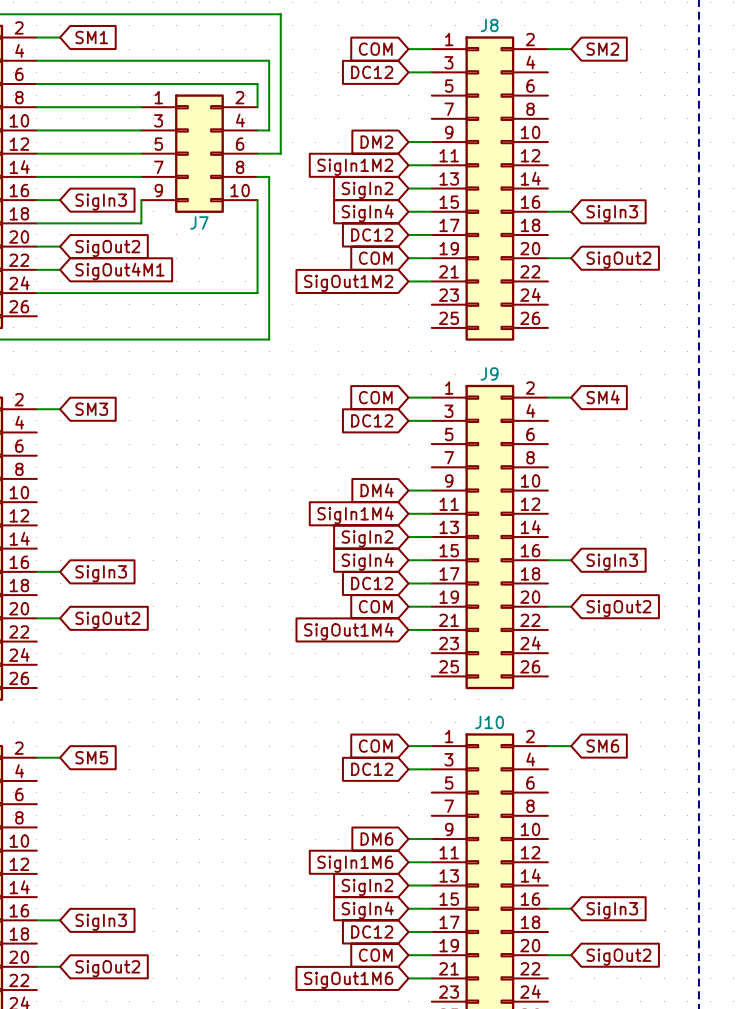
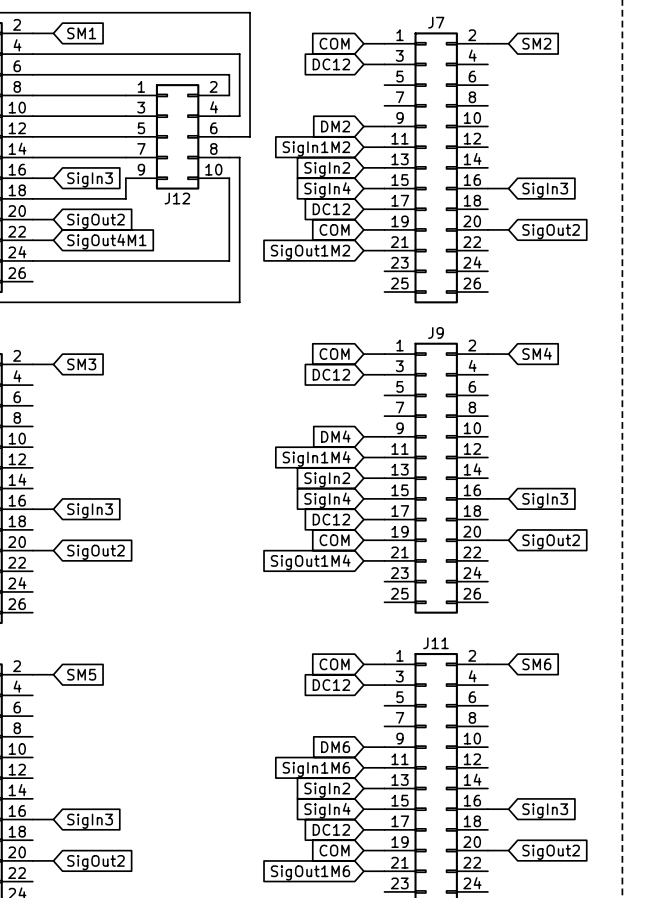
J8 name: J8 (489, 25) -> J7 (436, 22)
J7 name: J7 (199, 222) -> J12 (177, 198)
J10 name: J10 (489, 722) -> J11 (435, 643)

